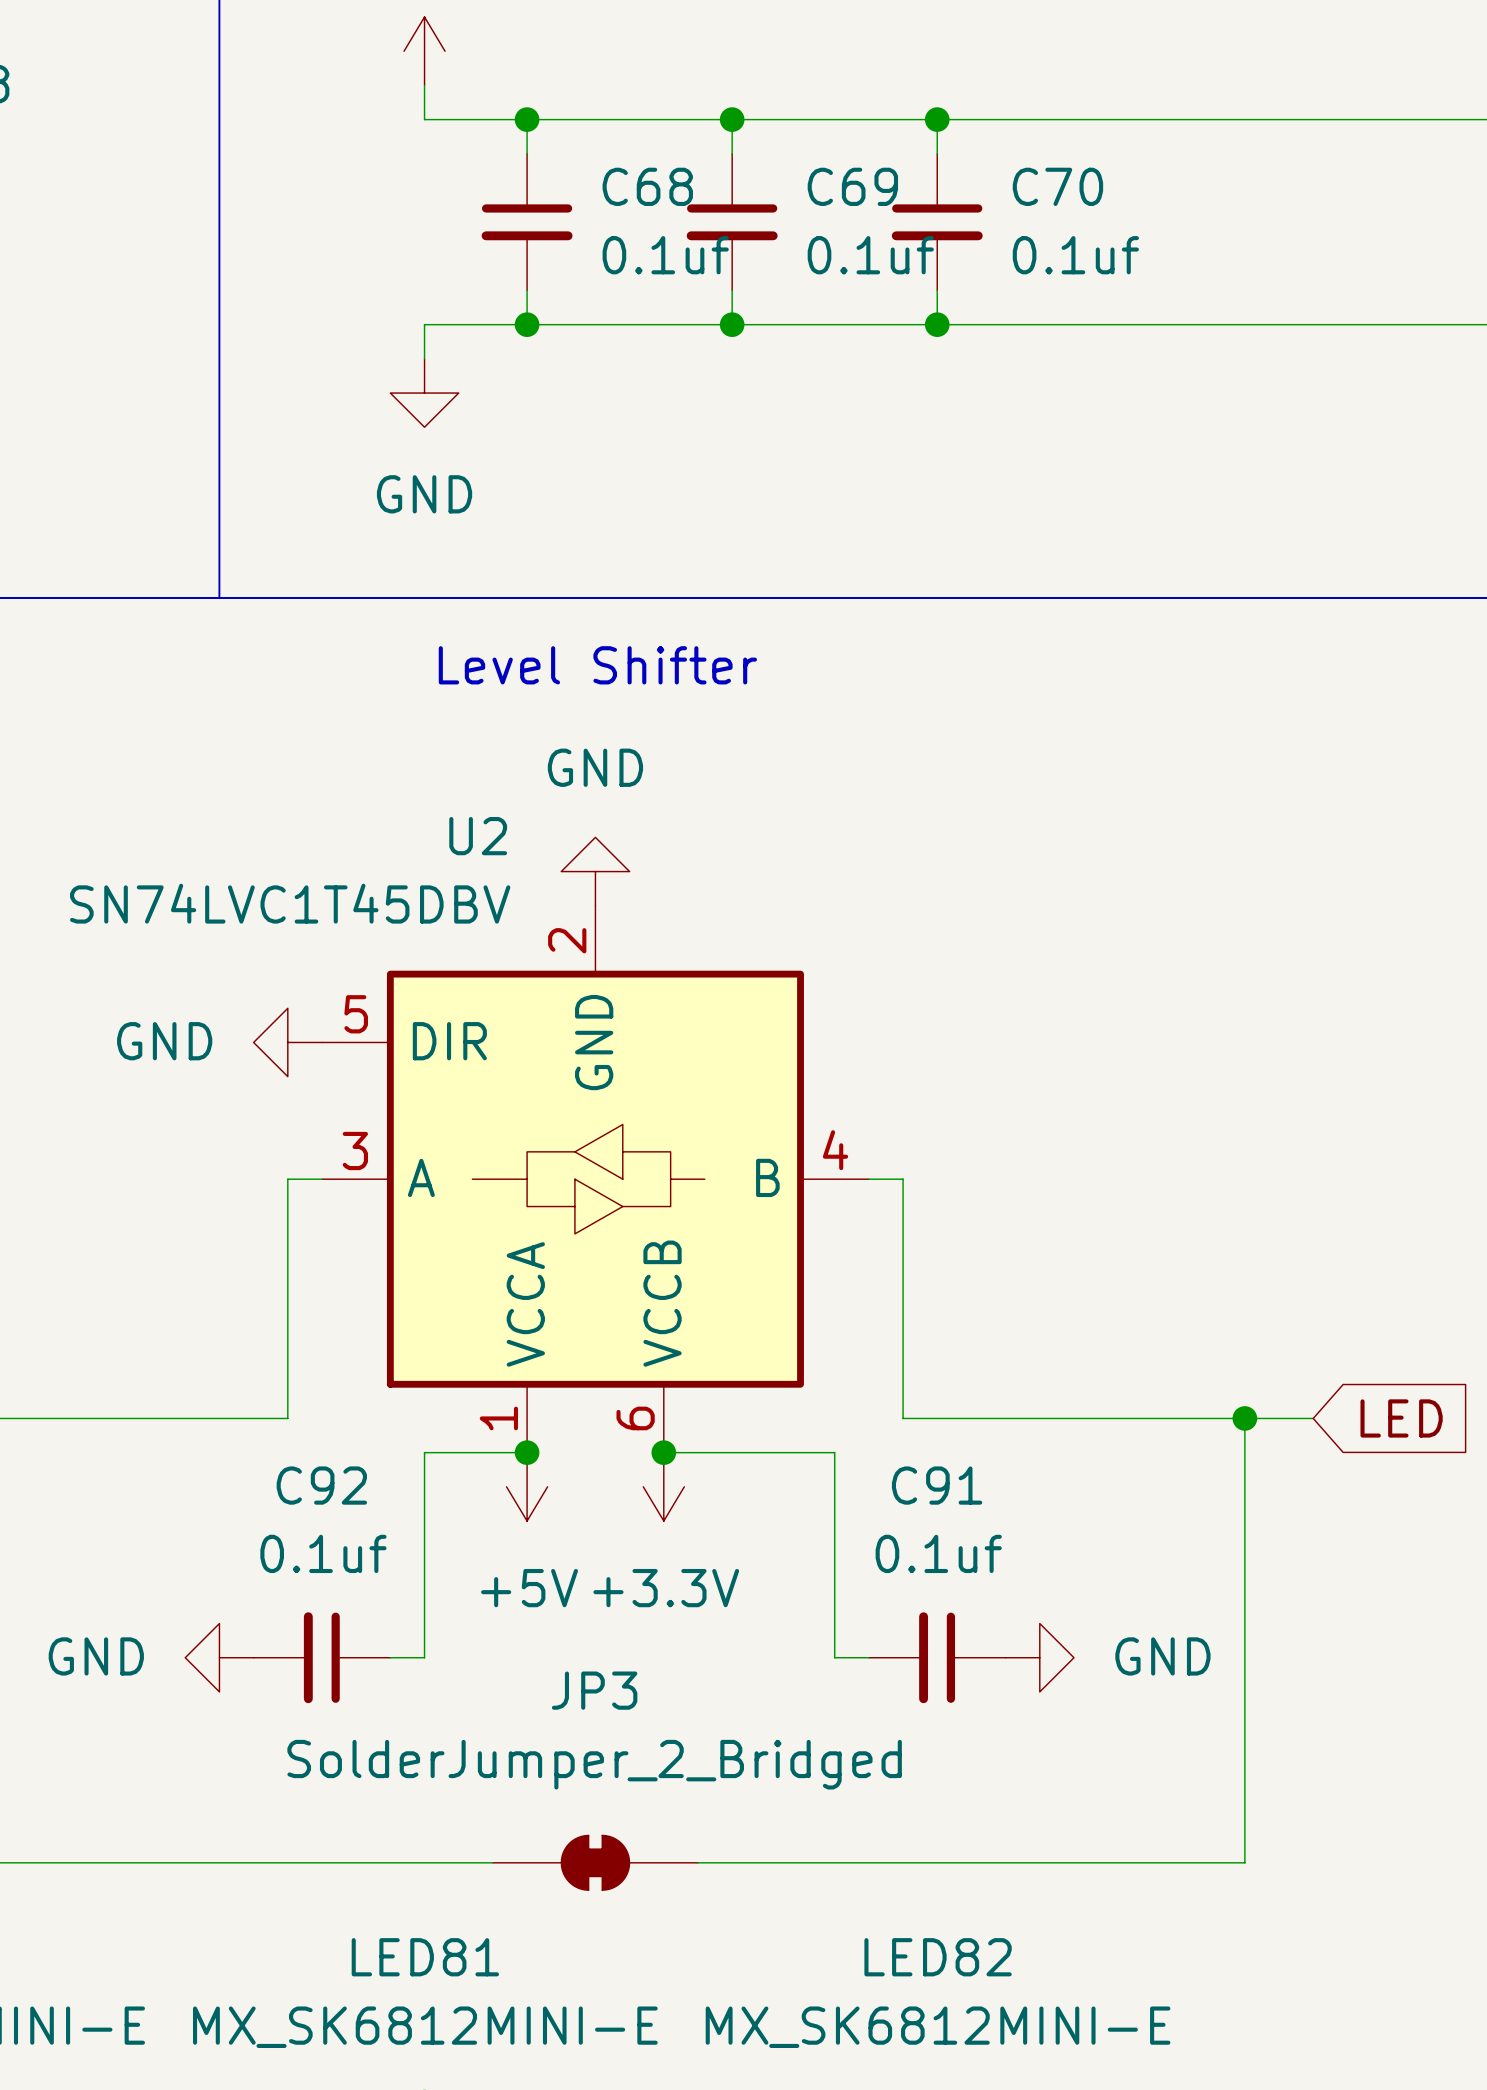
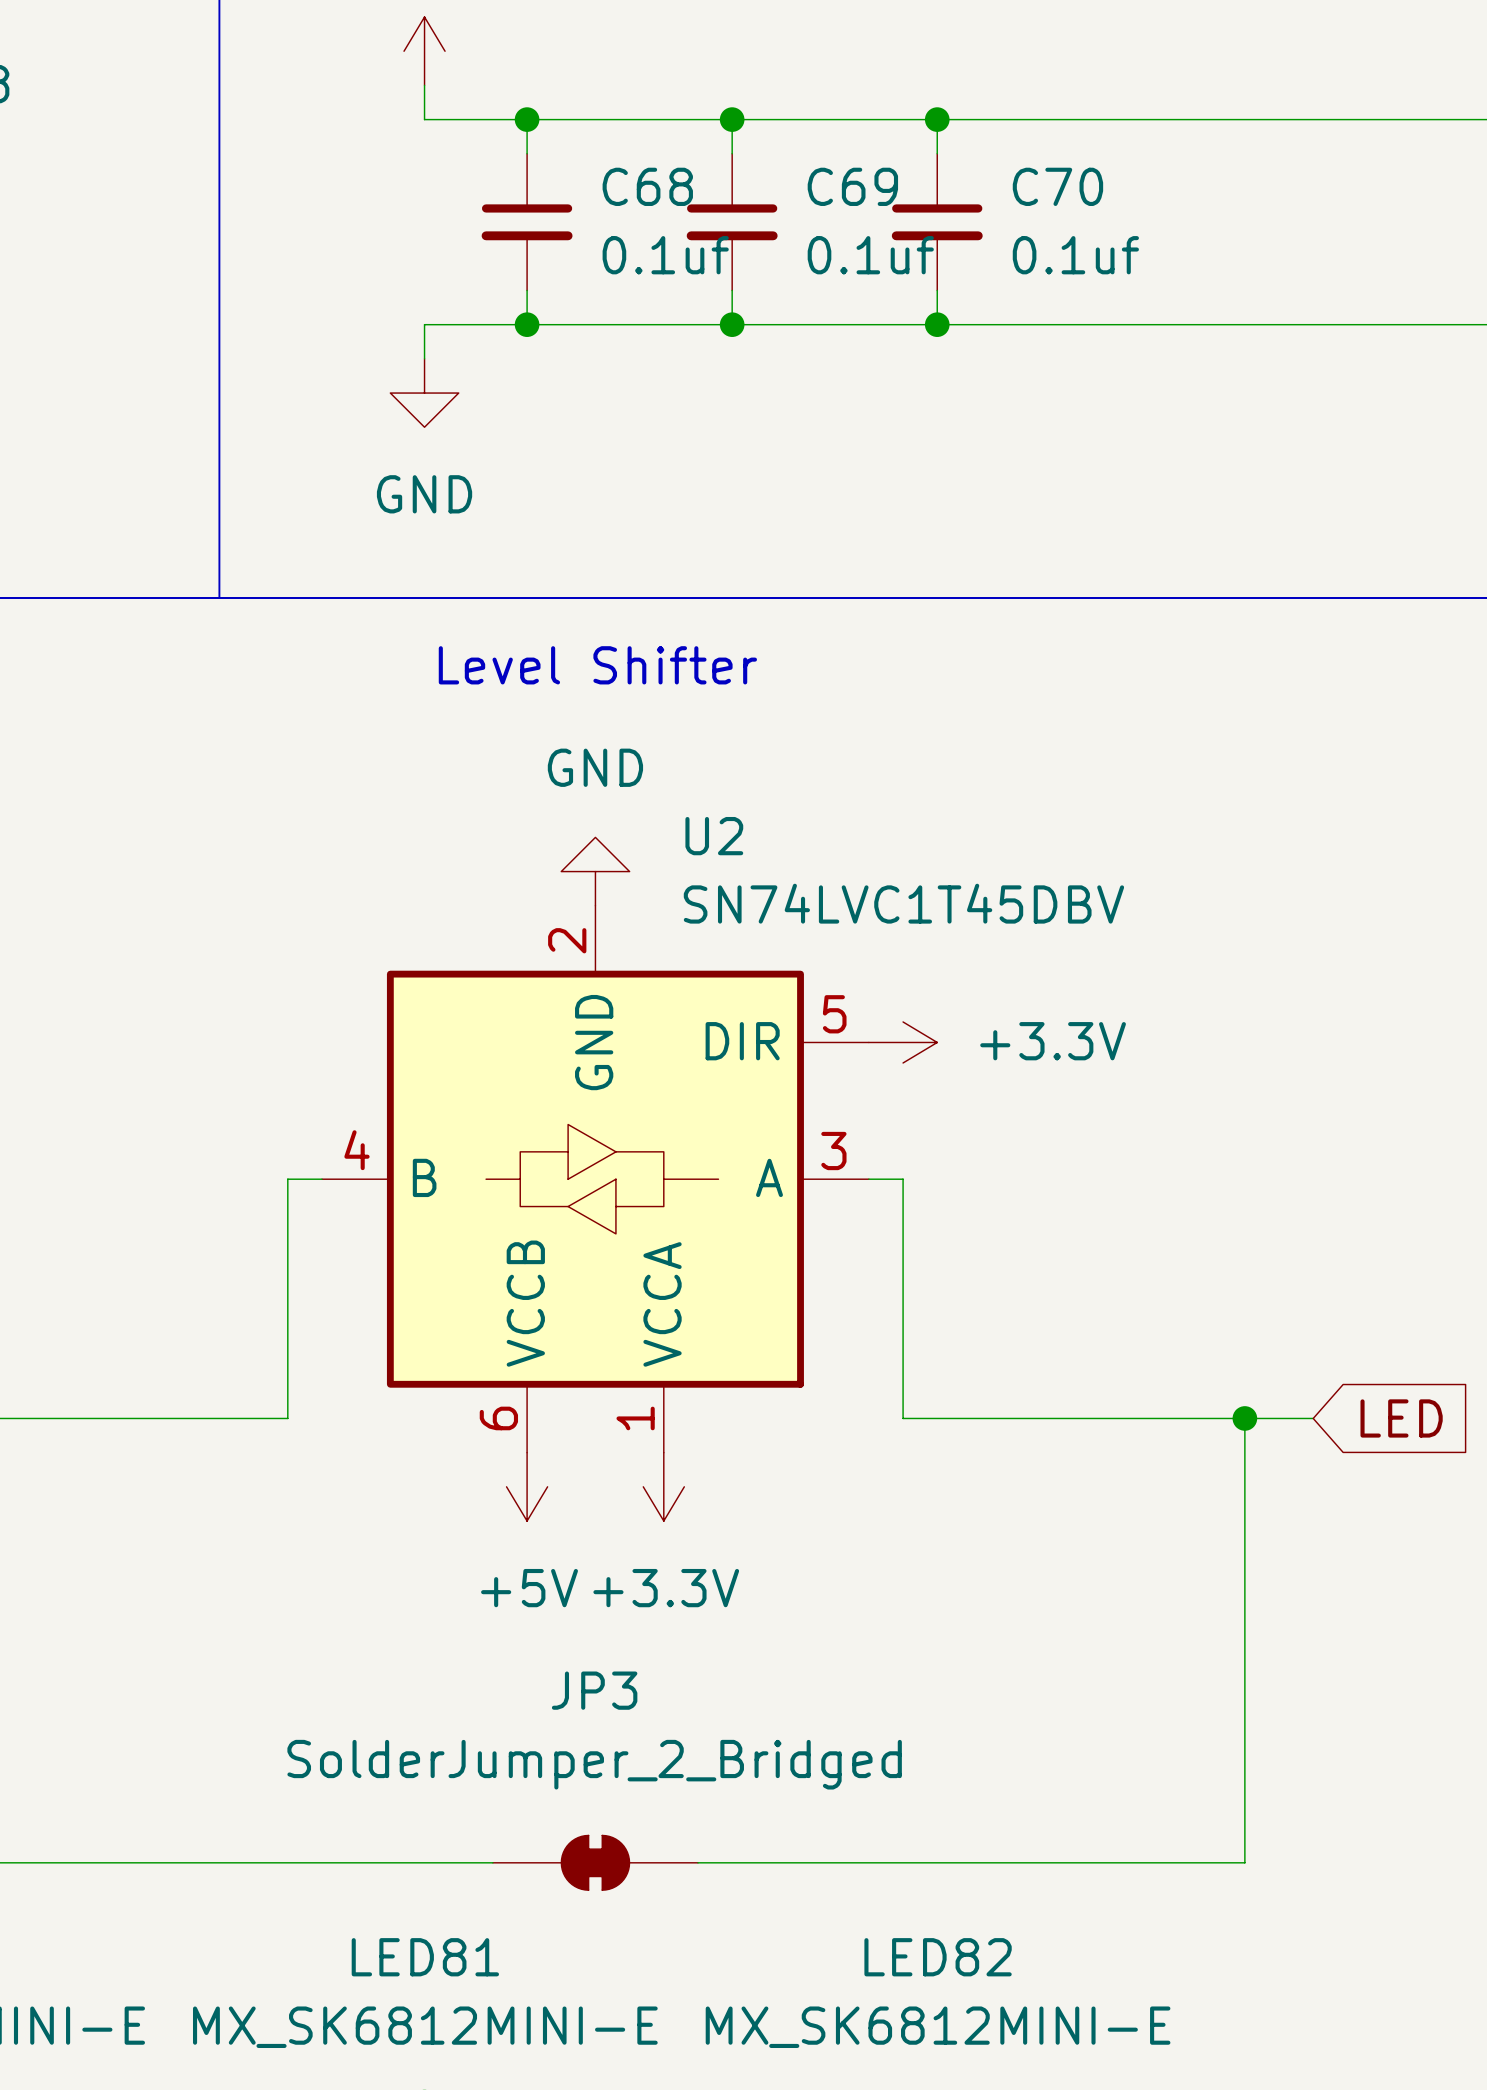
power symbol: GND (287, 1042) -> none
power symbol: none -> +3.3V (903, 1042)
U2 flip: as is (595, 1179) -> left-right (595, 1179)
wire: (527, 1452) (424, 1452) (424, 1657) (390, 1657) -> none
junction: (527, 1452) -> none
wire: (663, 1452) (834, 1452) (834, 1657) (868, 1657) -> none
junction: (663, 1452) -> none
power symbol: GND (219, 1657) -> none
C92: 0.1uf (321, 1657) -> none
C91: 0.1uf (937, 1657) -> none
power symbol: GND (1039, 1657) -> none

